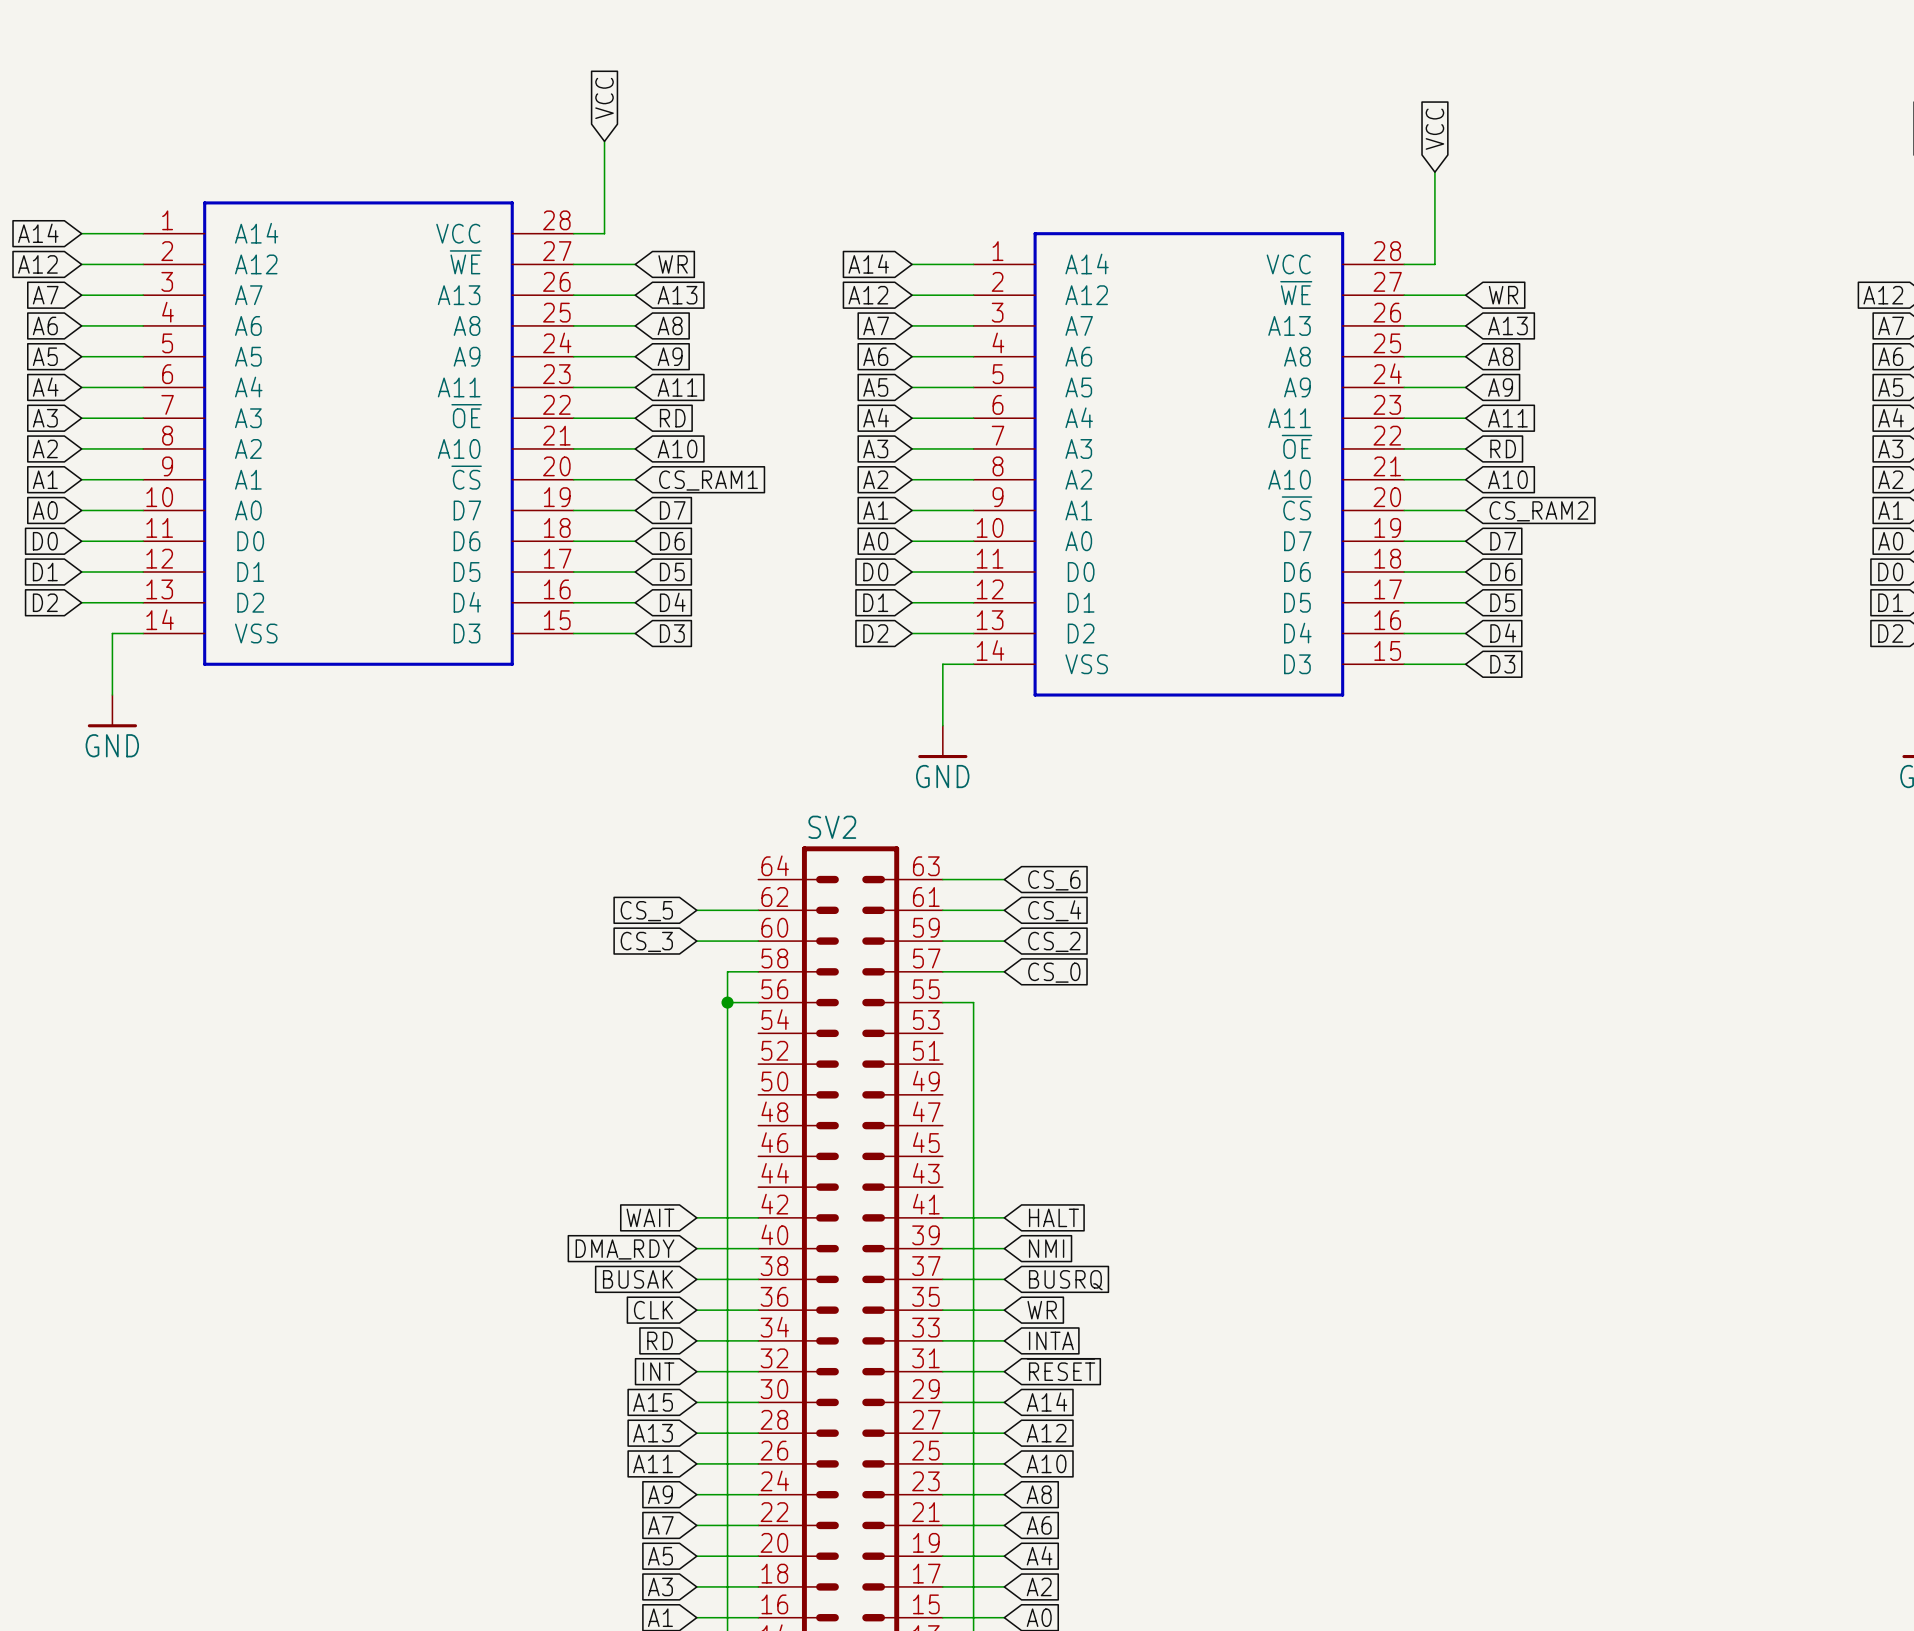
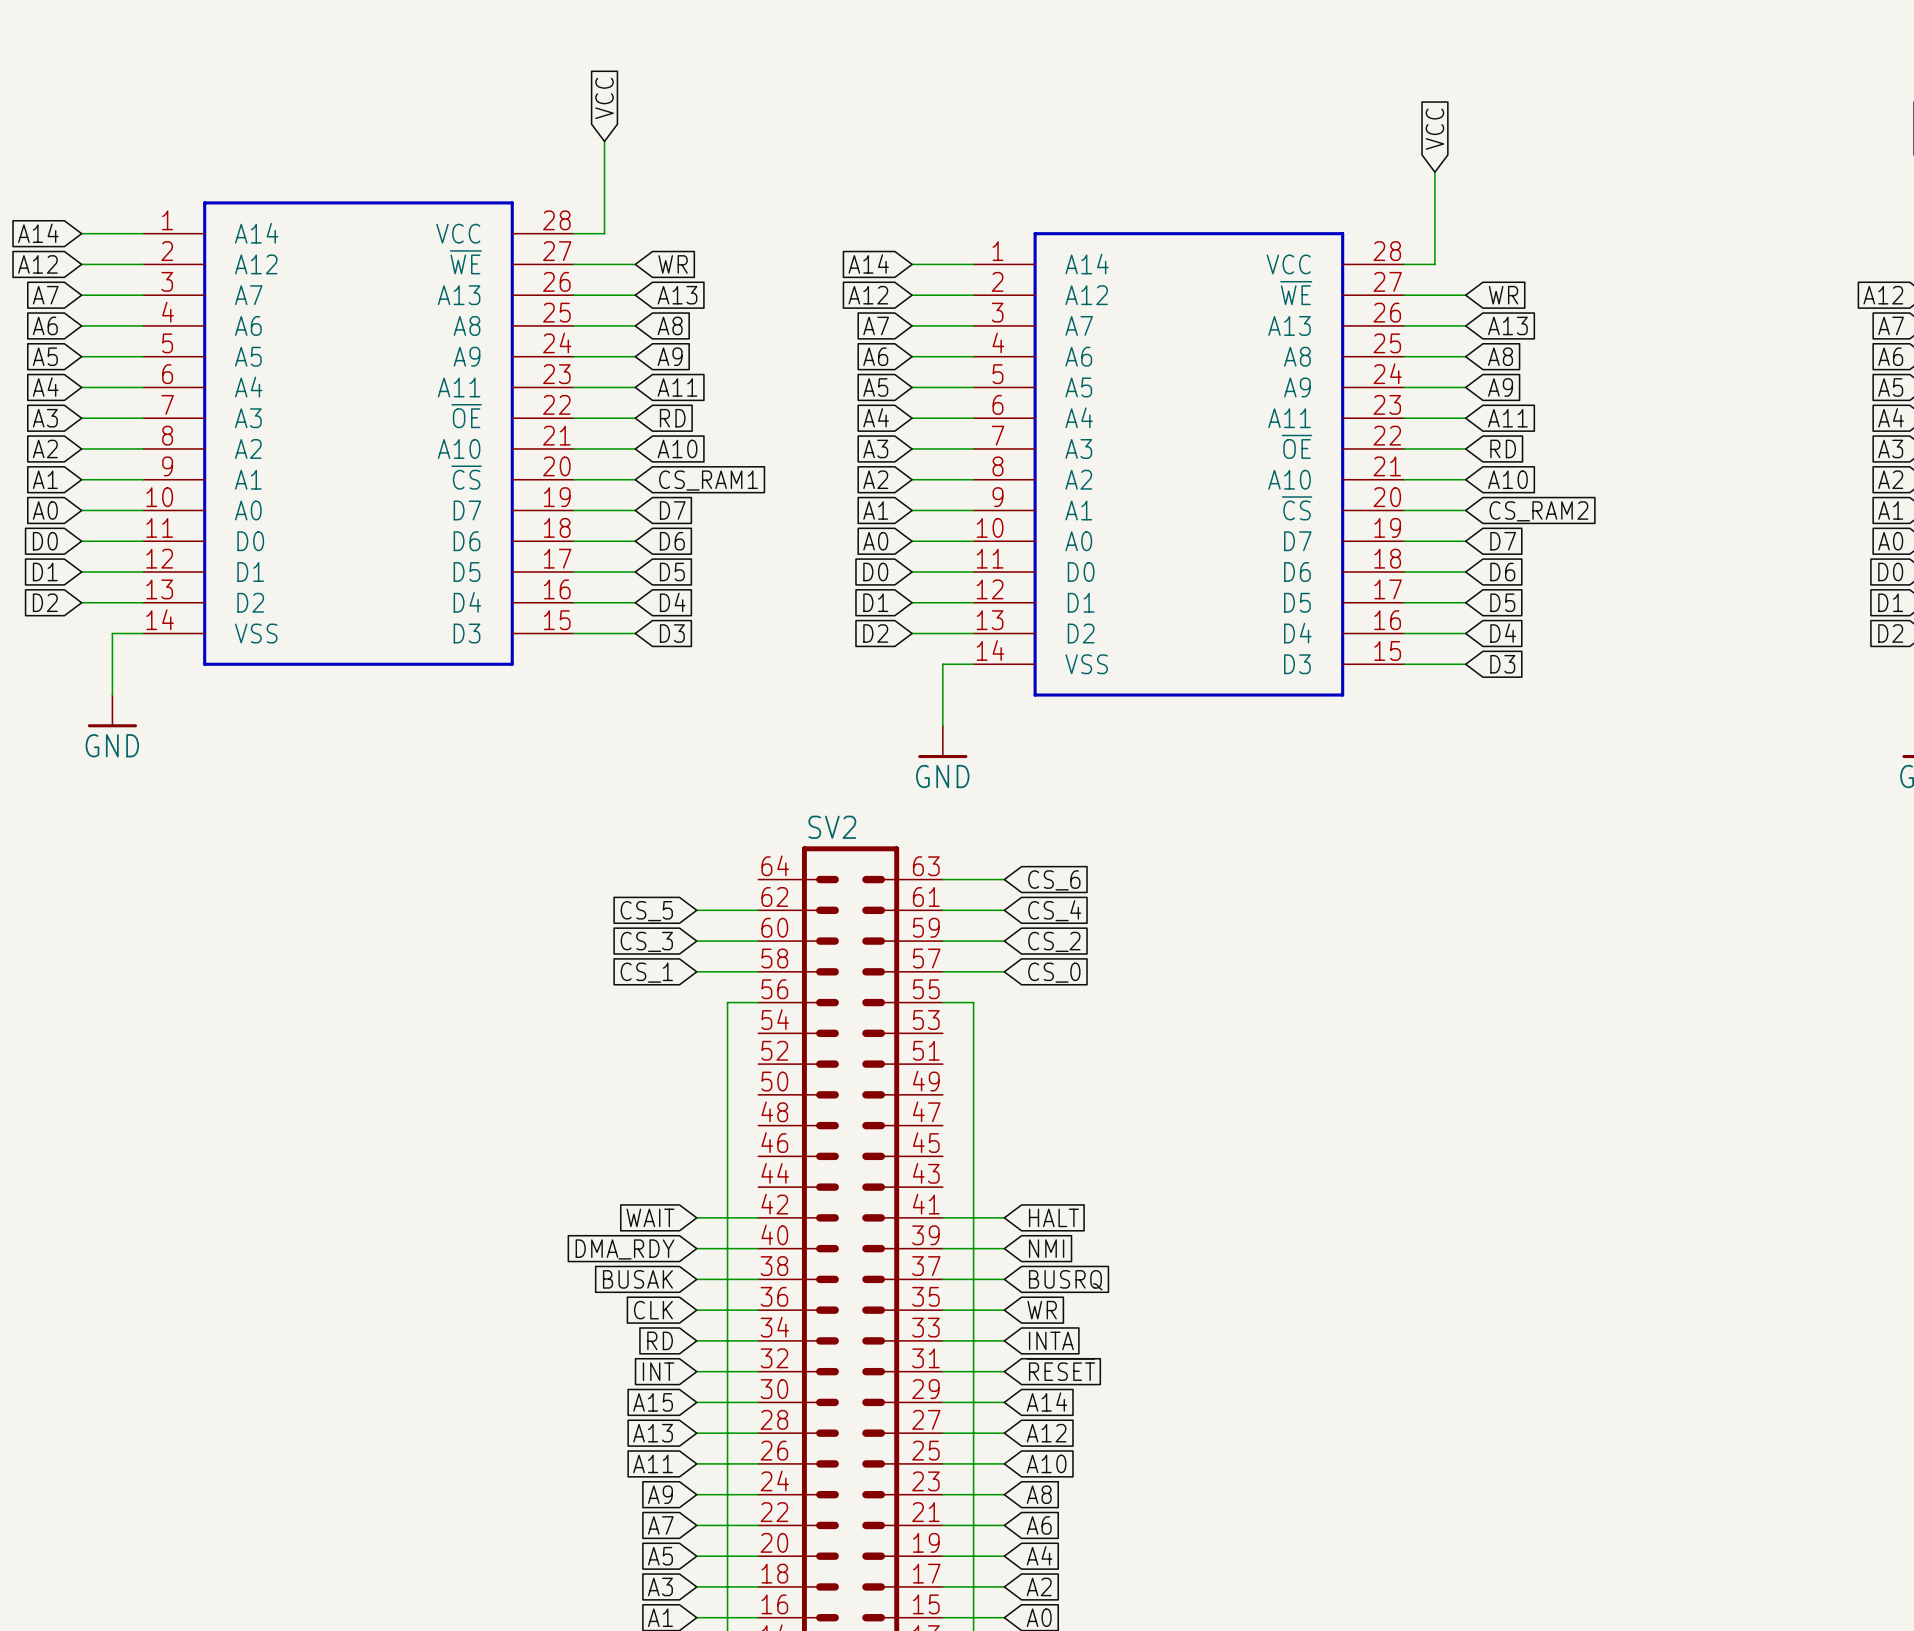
wire: (727, 971) (727, 1002) -> (727, 971) (696, 971)
global label: none -> CS_1 (646, 972)
junction: (727, 1002) -> none

